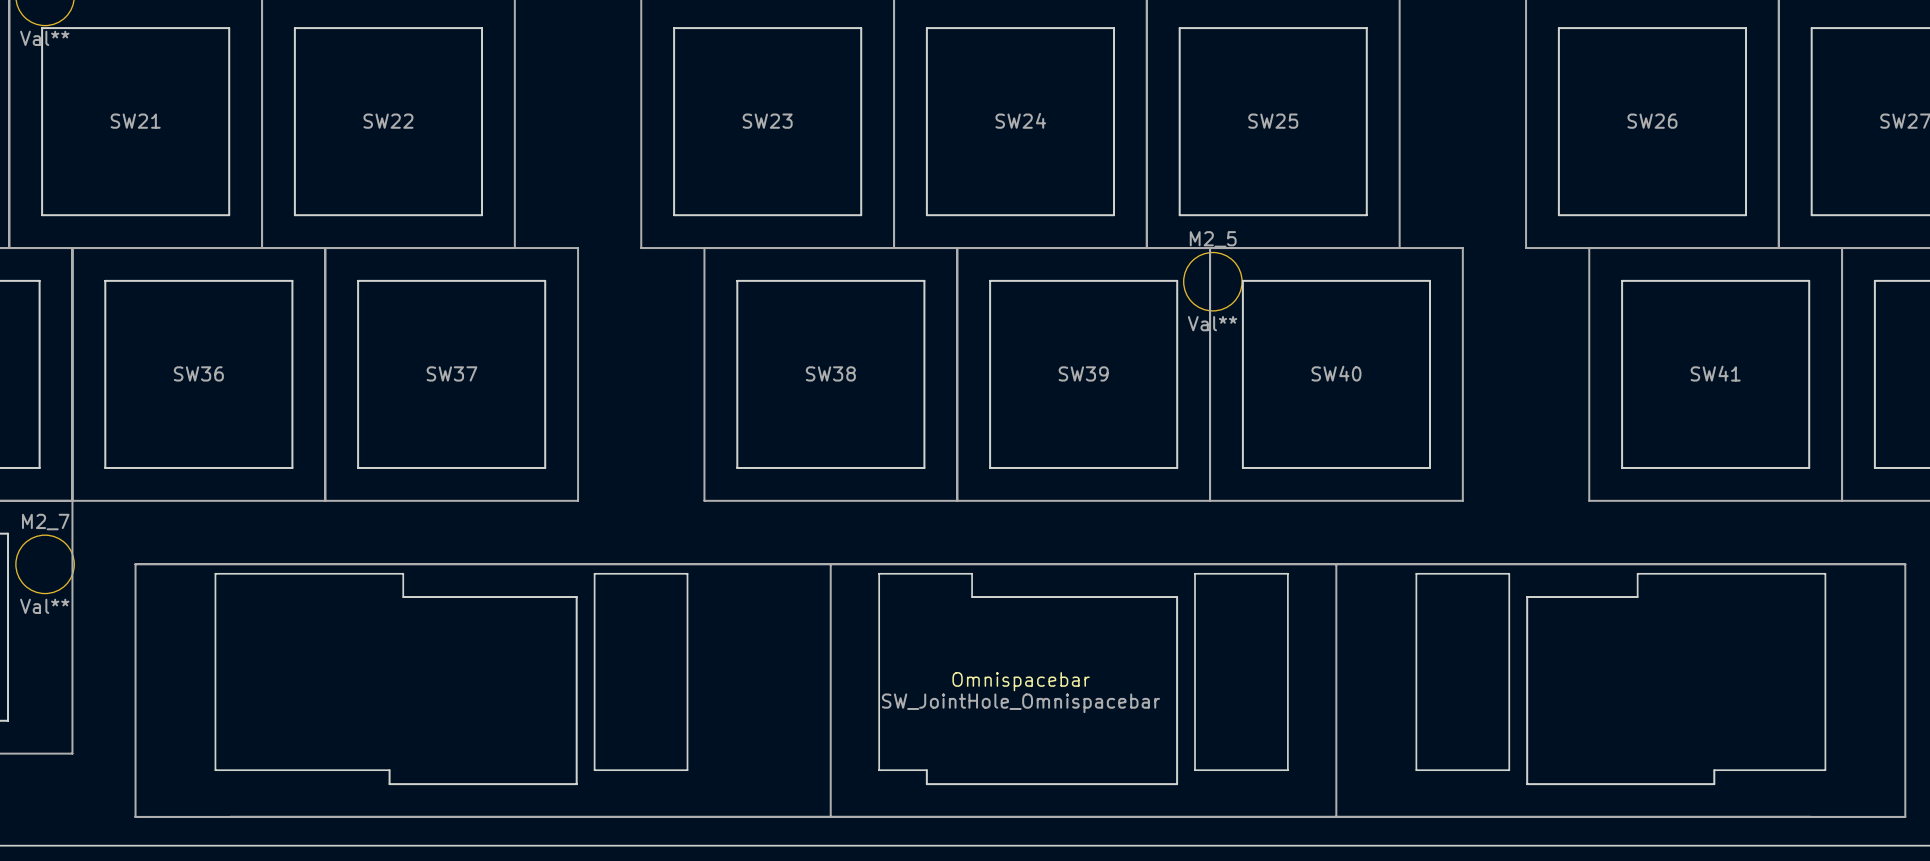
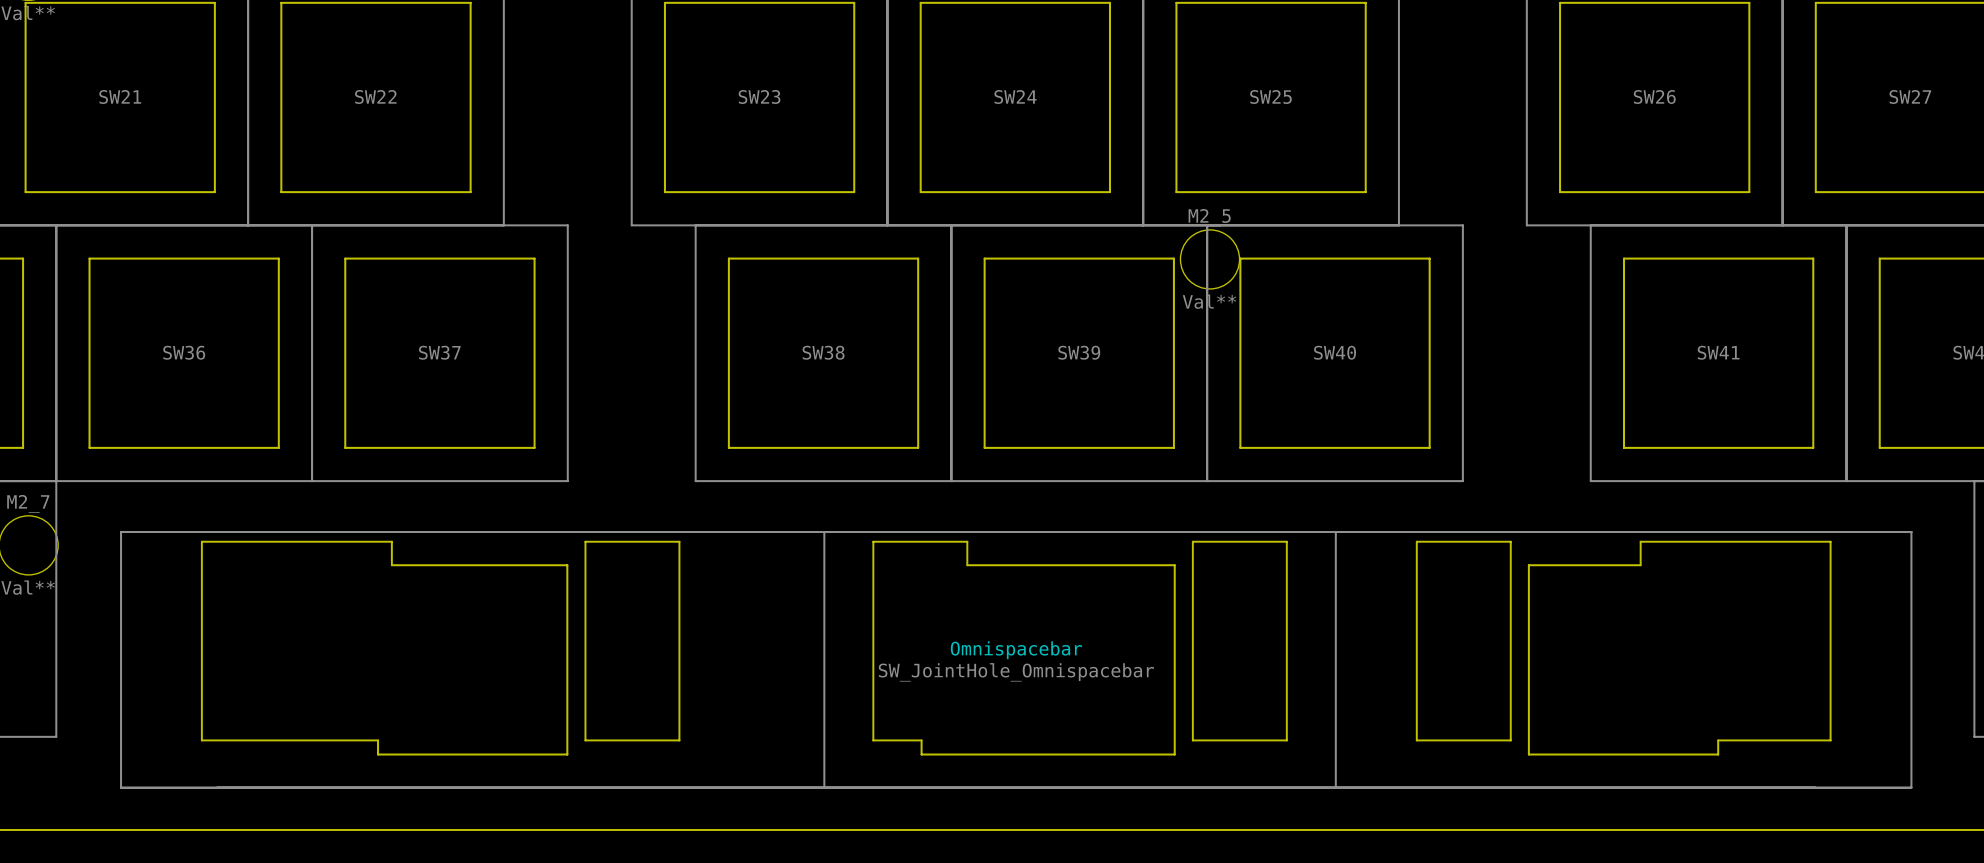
Omnispacebar position: (1020, 690) -> (1016, 659)

